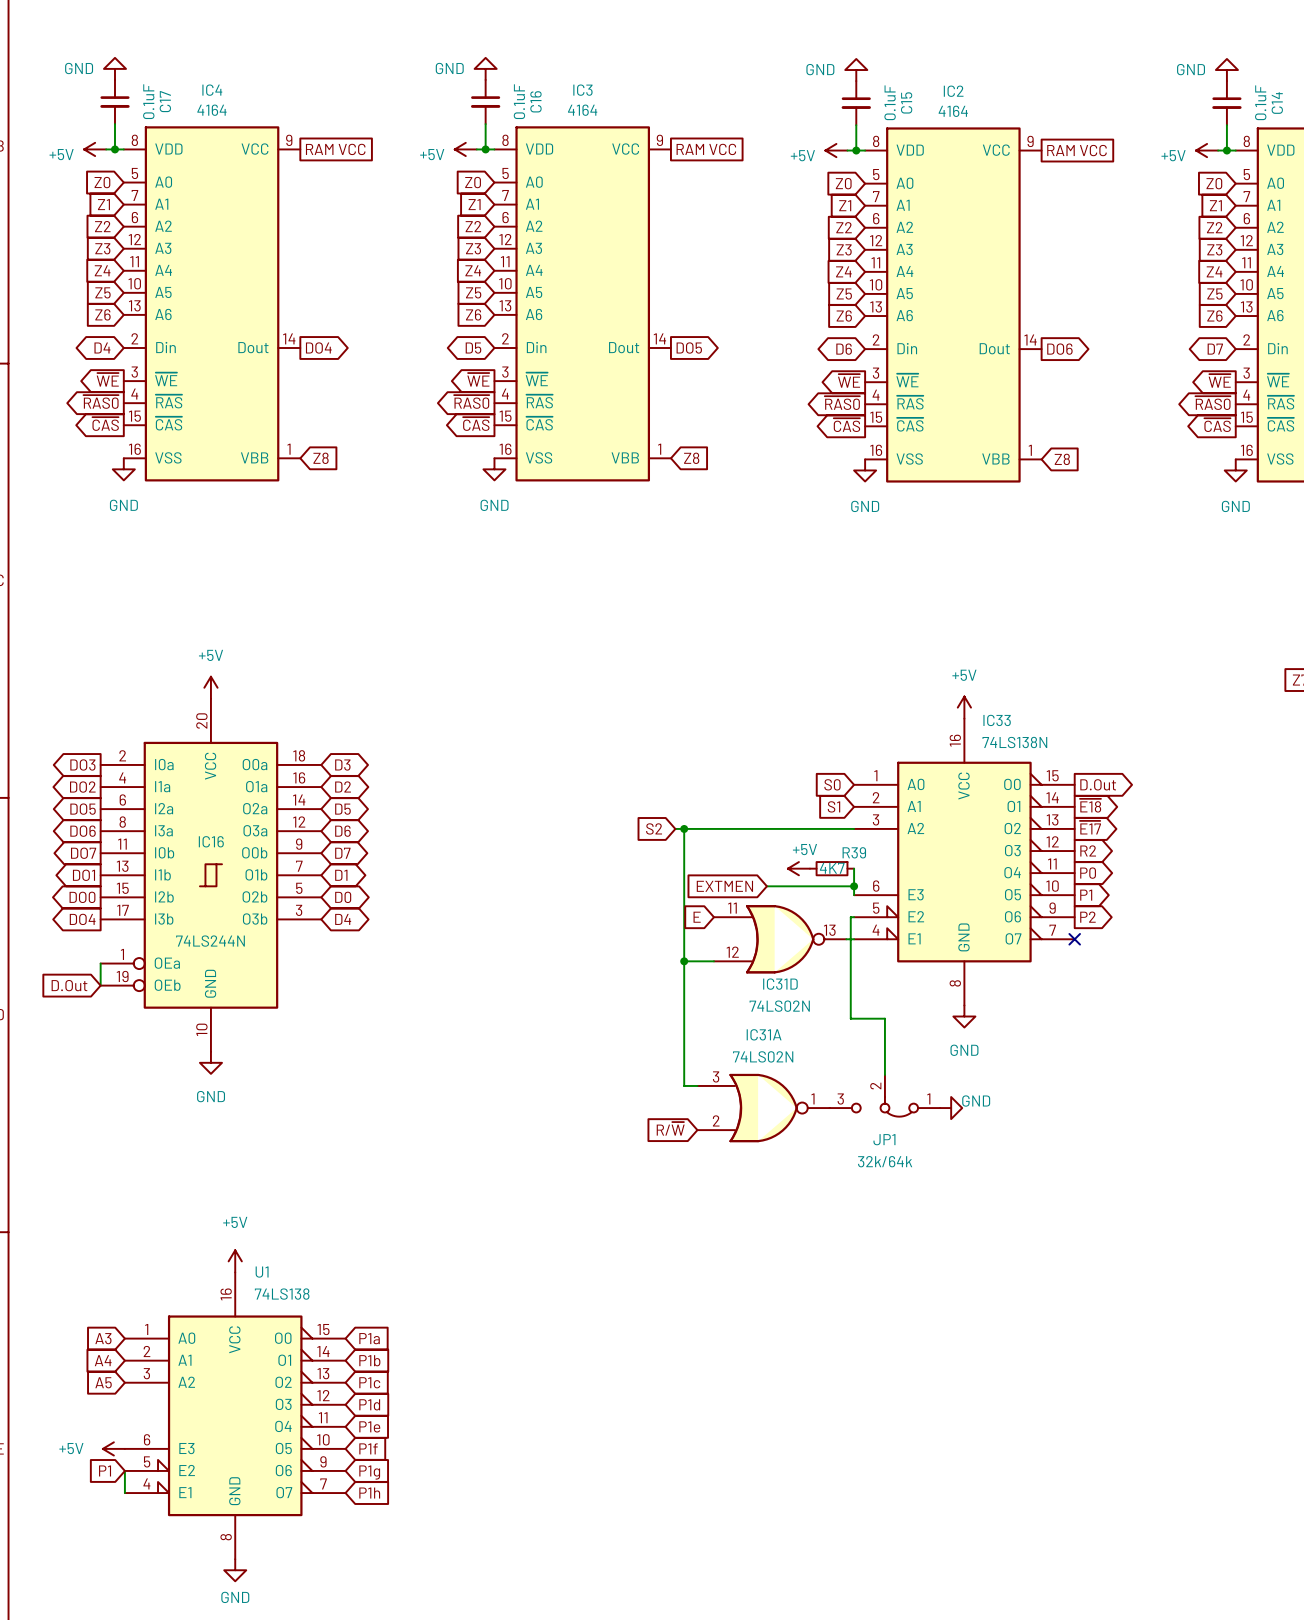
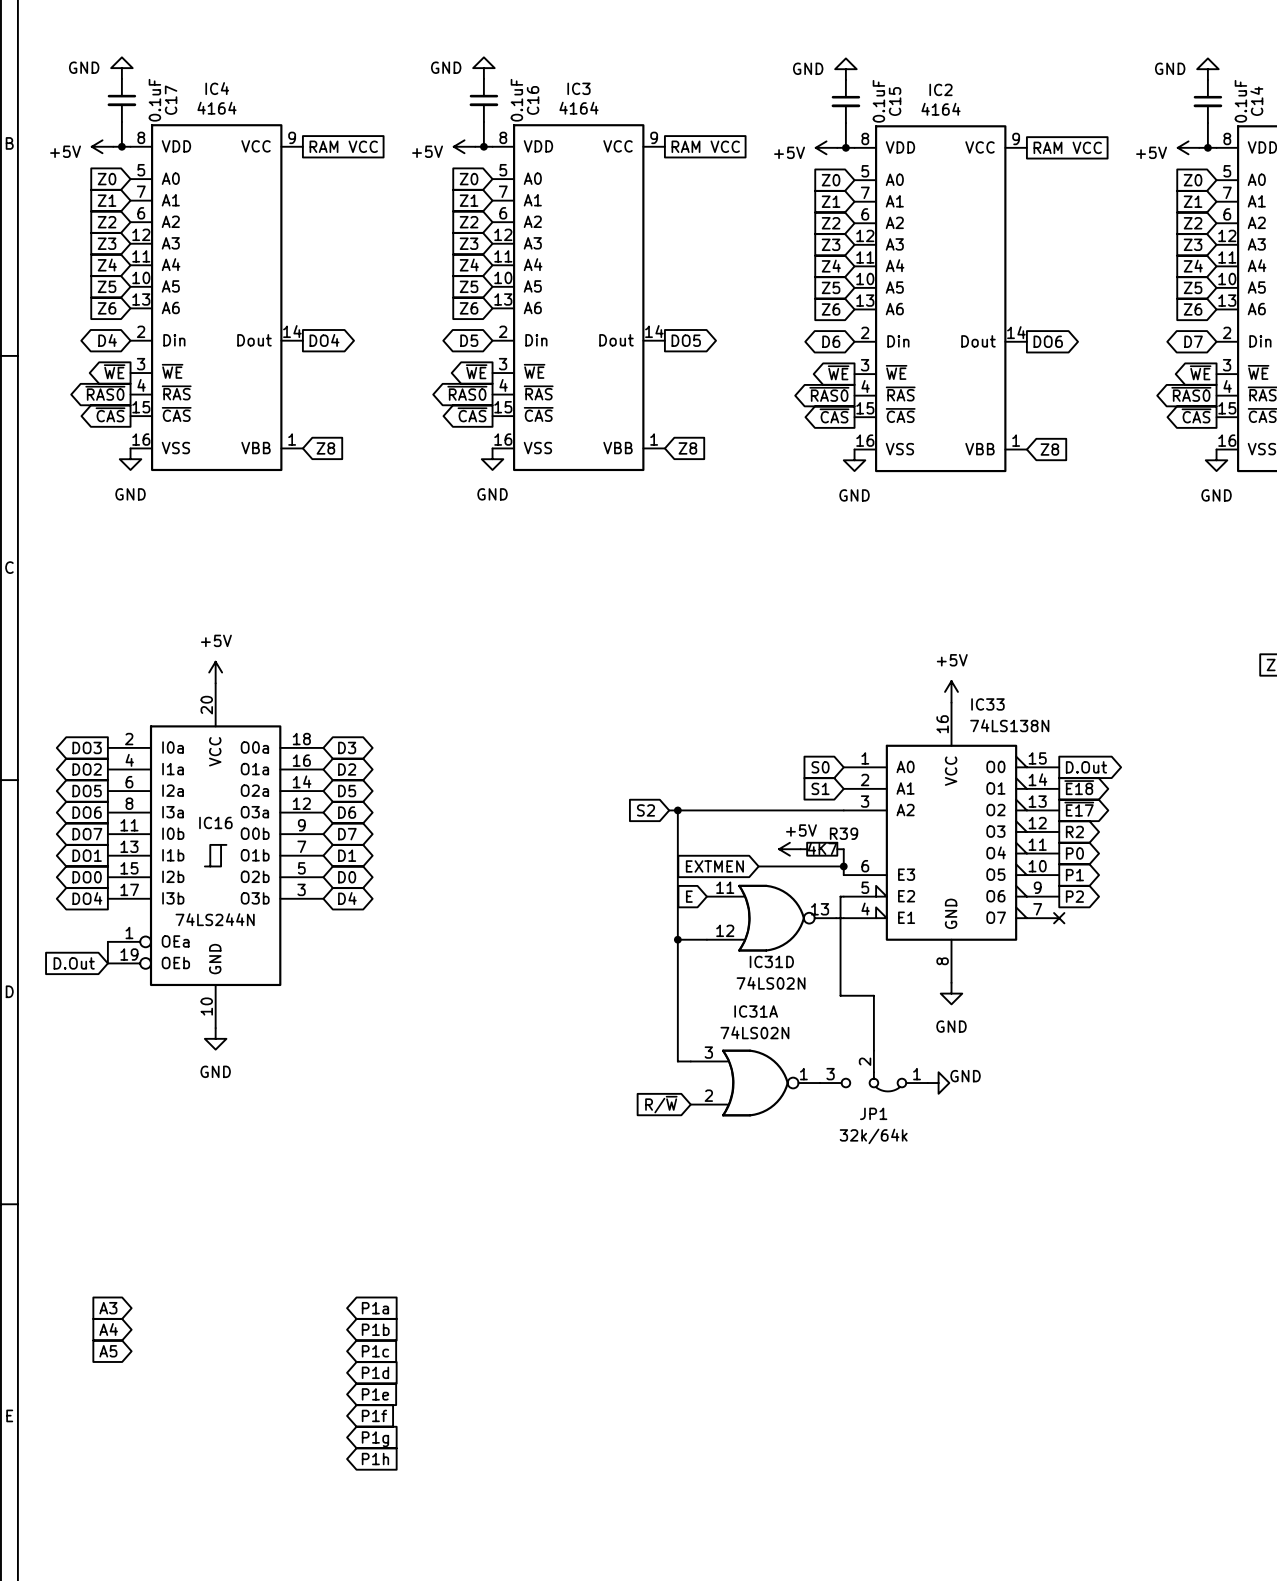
power symbol: +5V (235, 1261) -> none
U1: 74LS138 (235, 1415) -> none
power symbol: +5V (113, 1448) -> none
global label: P1 (105, 1470) -> none
wire: (124, 1470) (124, 1493) -> none
power symbol: GND (235, 1570) -> none

